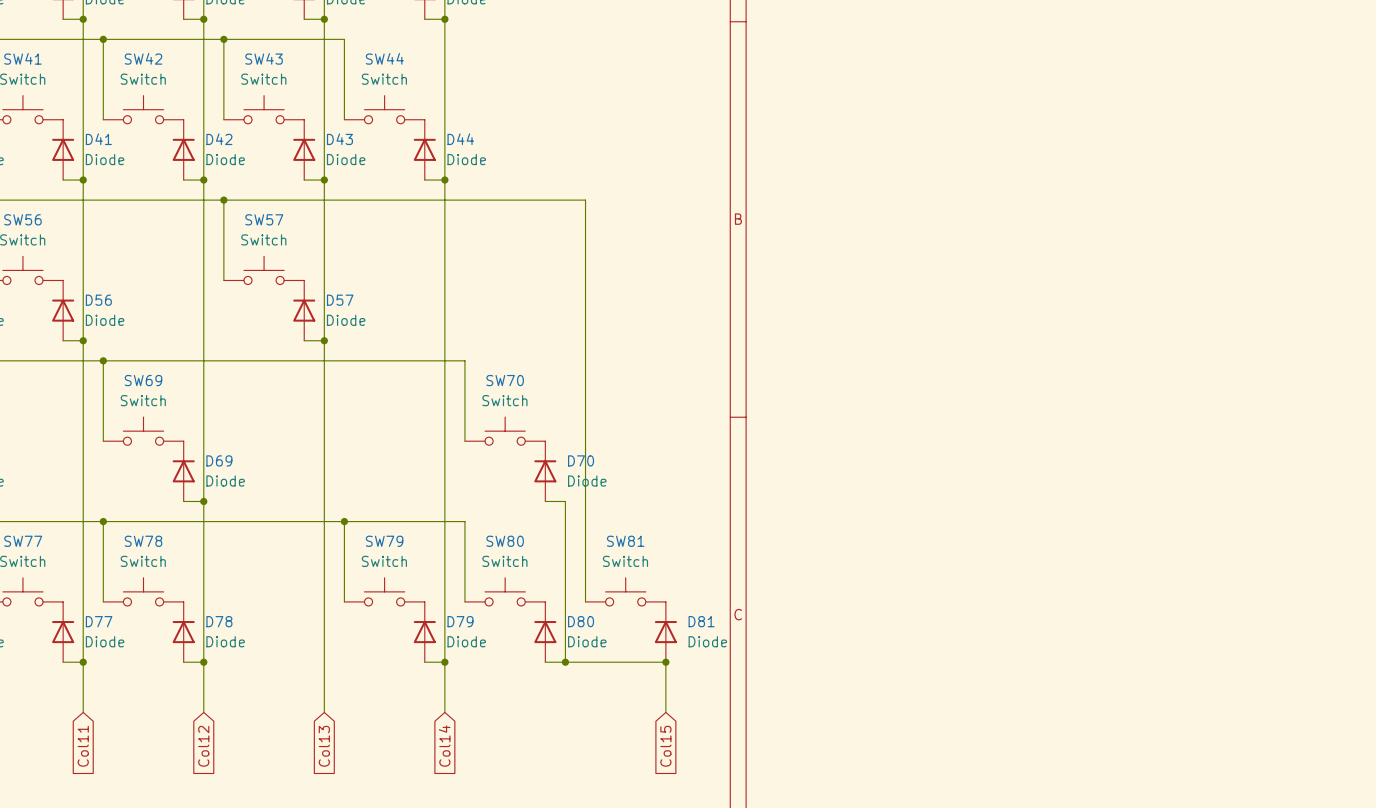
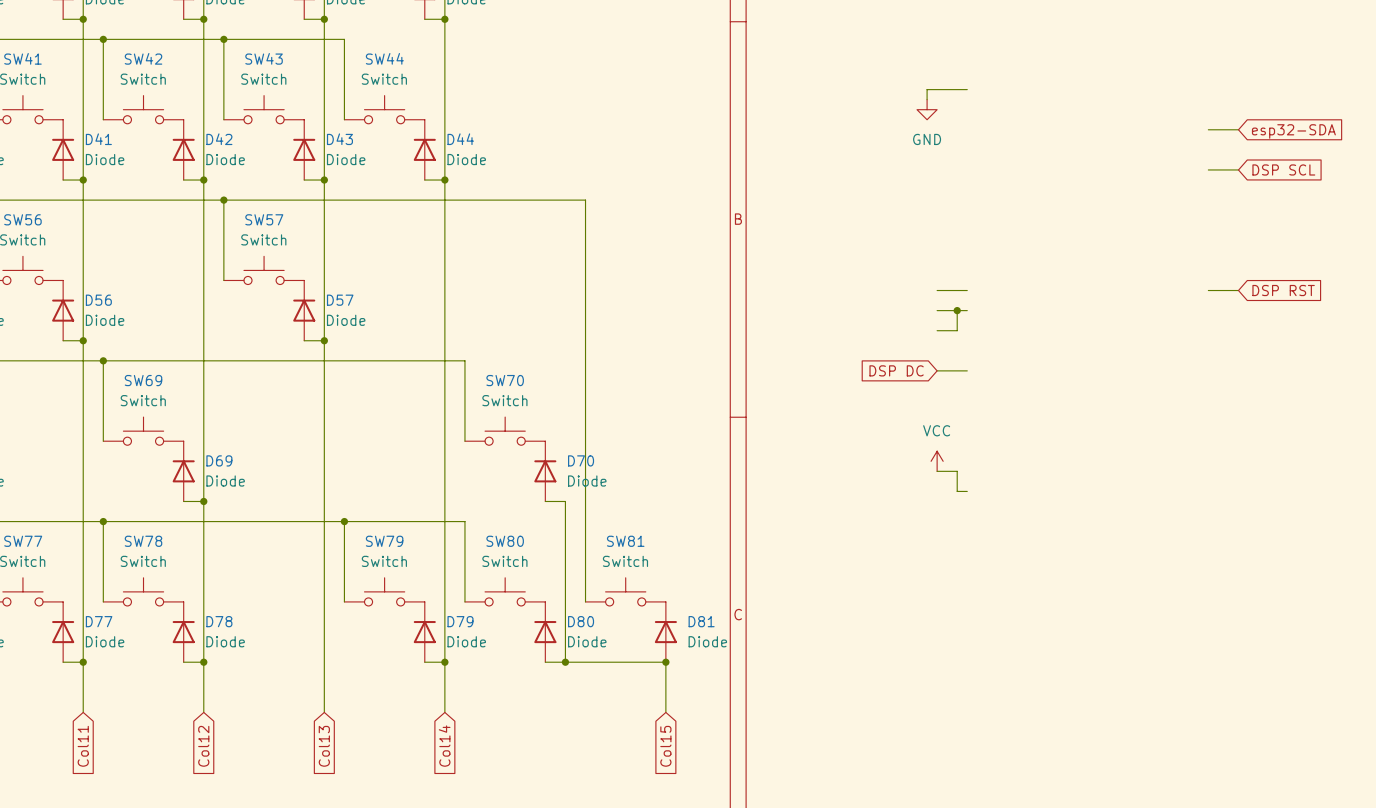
wire: none -> (967, 89) (927, 89) (927, 99)
power symbol: none -> GND (927, 109)
wire: none -> (1208, 129) (1238, 129)
global label: none -> esp32-SDA (1293, 131)
wire: none -> (1208, 169) (1238, 169)
global label: none -> DSP SCL (1283, 169)
wire: none -> (937, 290) (967, 290)
wire: none -> (1208, 290) (1238, 290)
global label: none -> DSP RST (1283, 290)
wire: none -> (937, 310) (967, 310)
wire: none -> (957, 310) (957, 330) (937, 330)
junction: none -> (957, 310)
global label: none -> DSP DC (896, 370)
wire: none -> (937, 370) (967, 370)
power symbol: none -> VCC (937, 461)
wire: none -> (937, 471) (957, 471) (957, 491) (967, 491)

